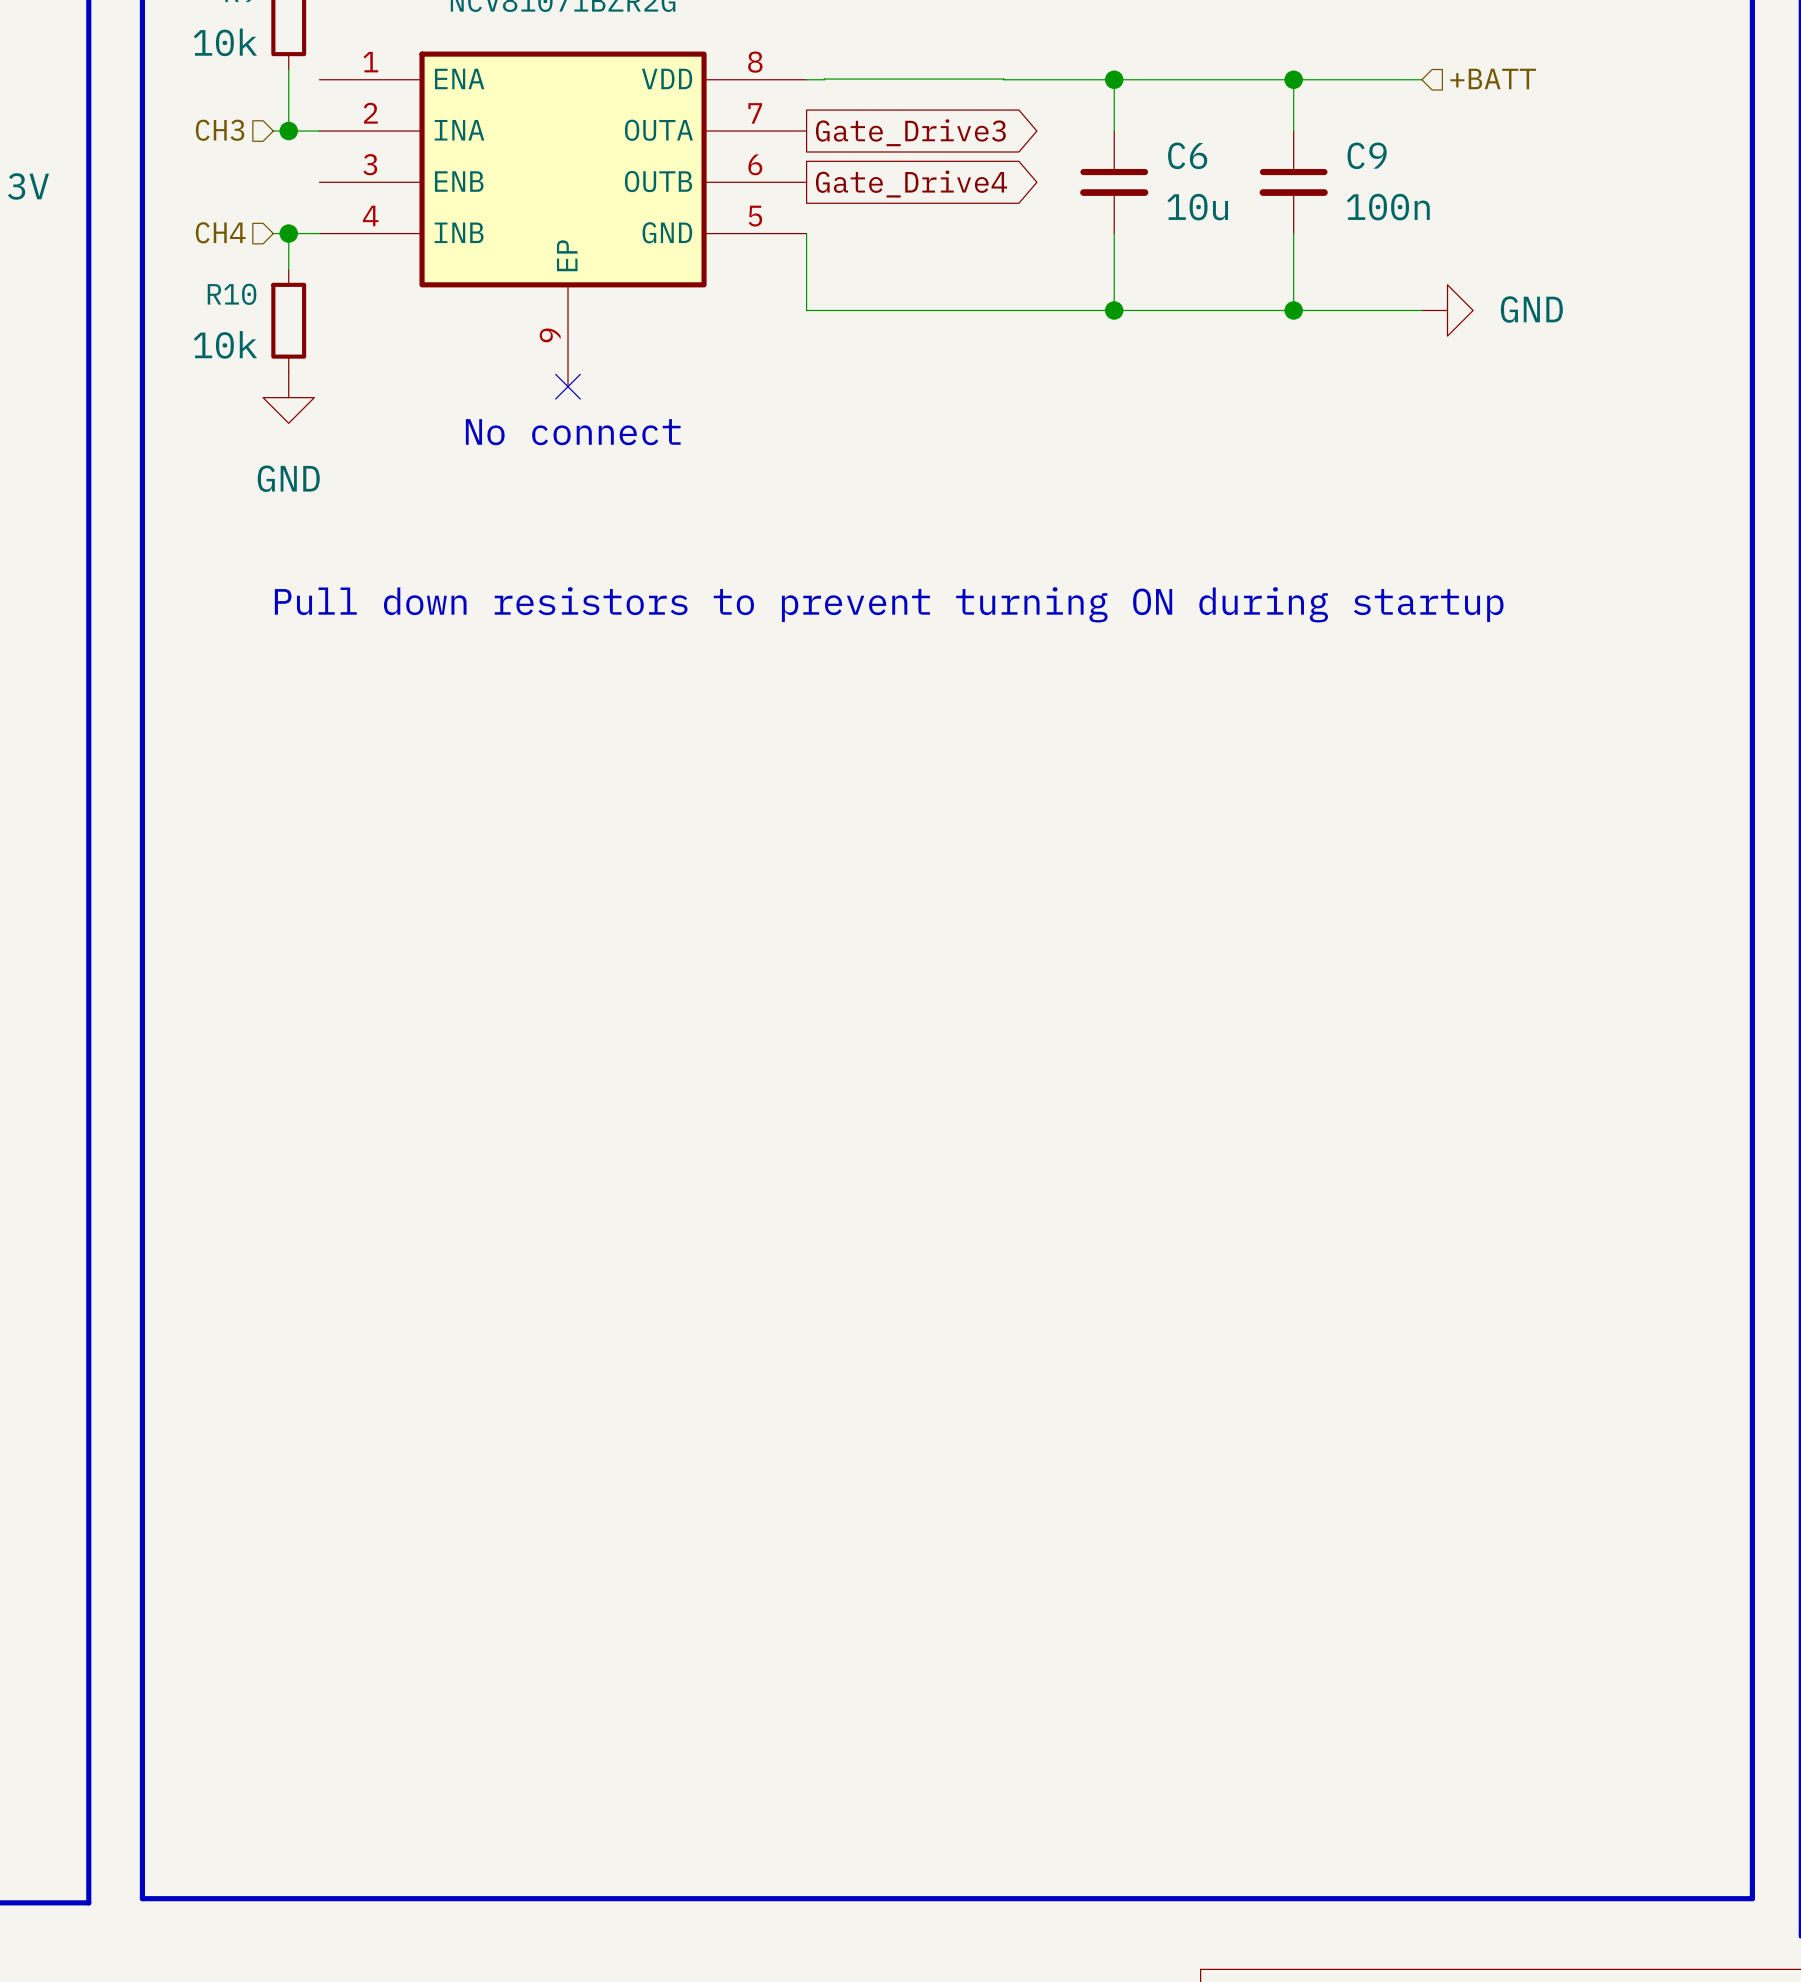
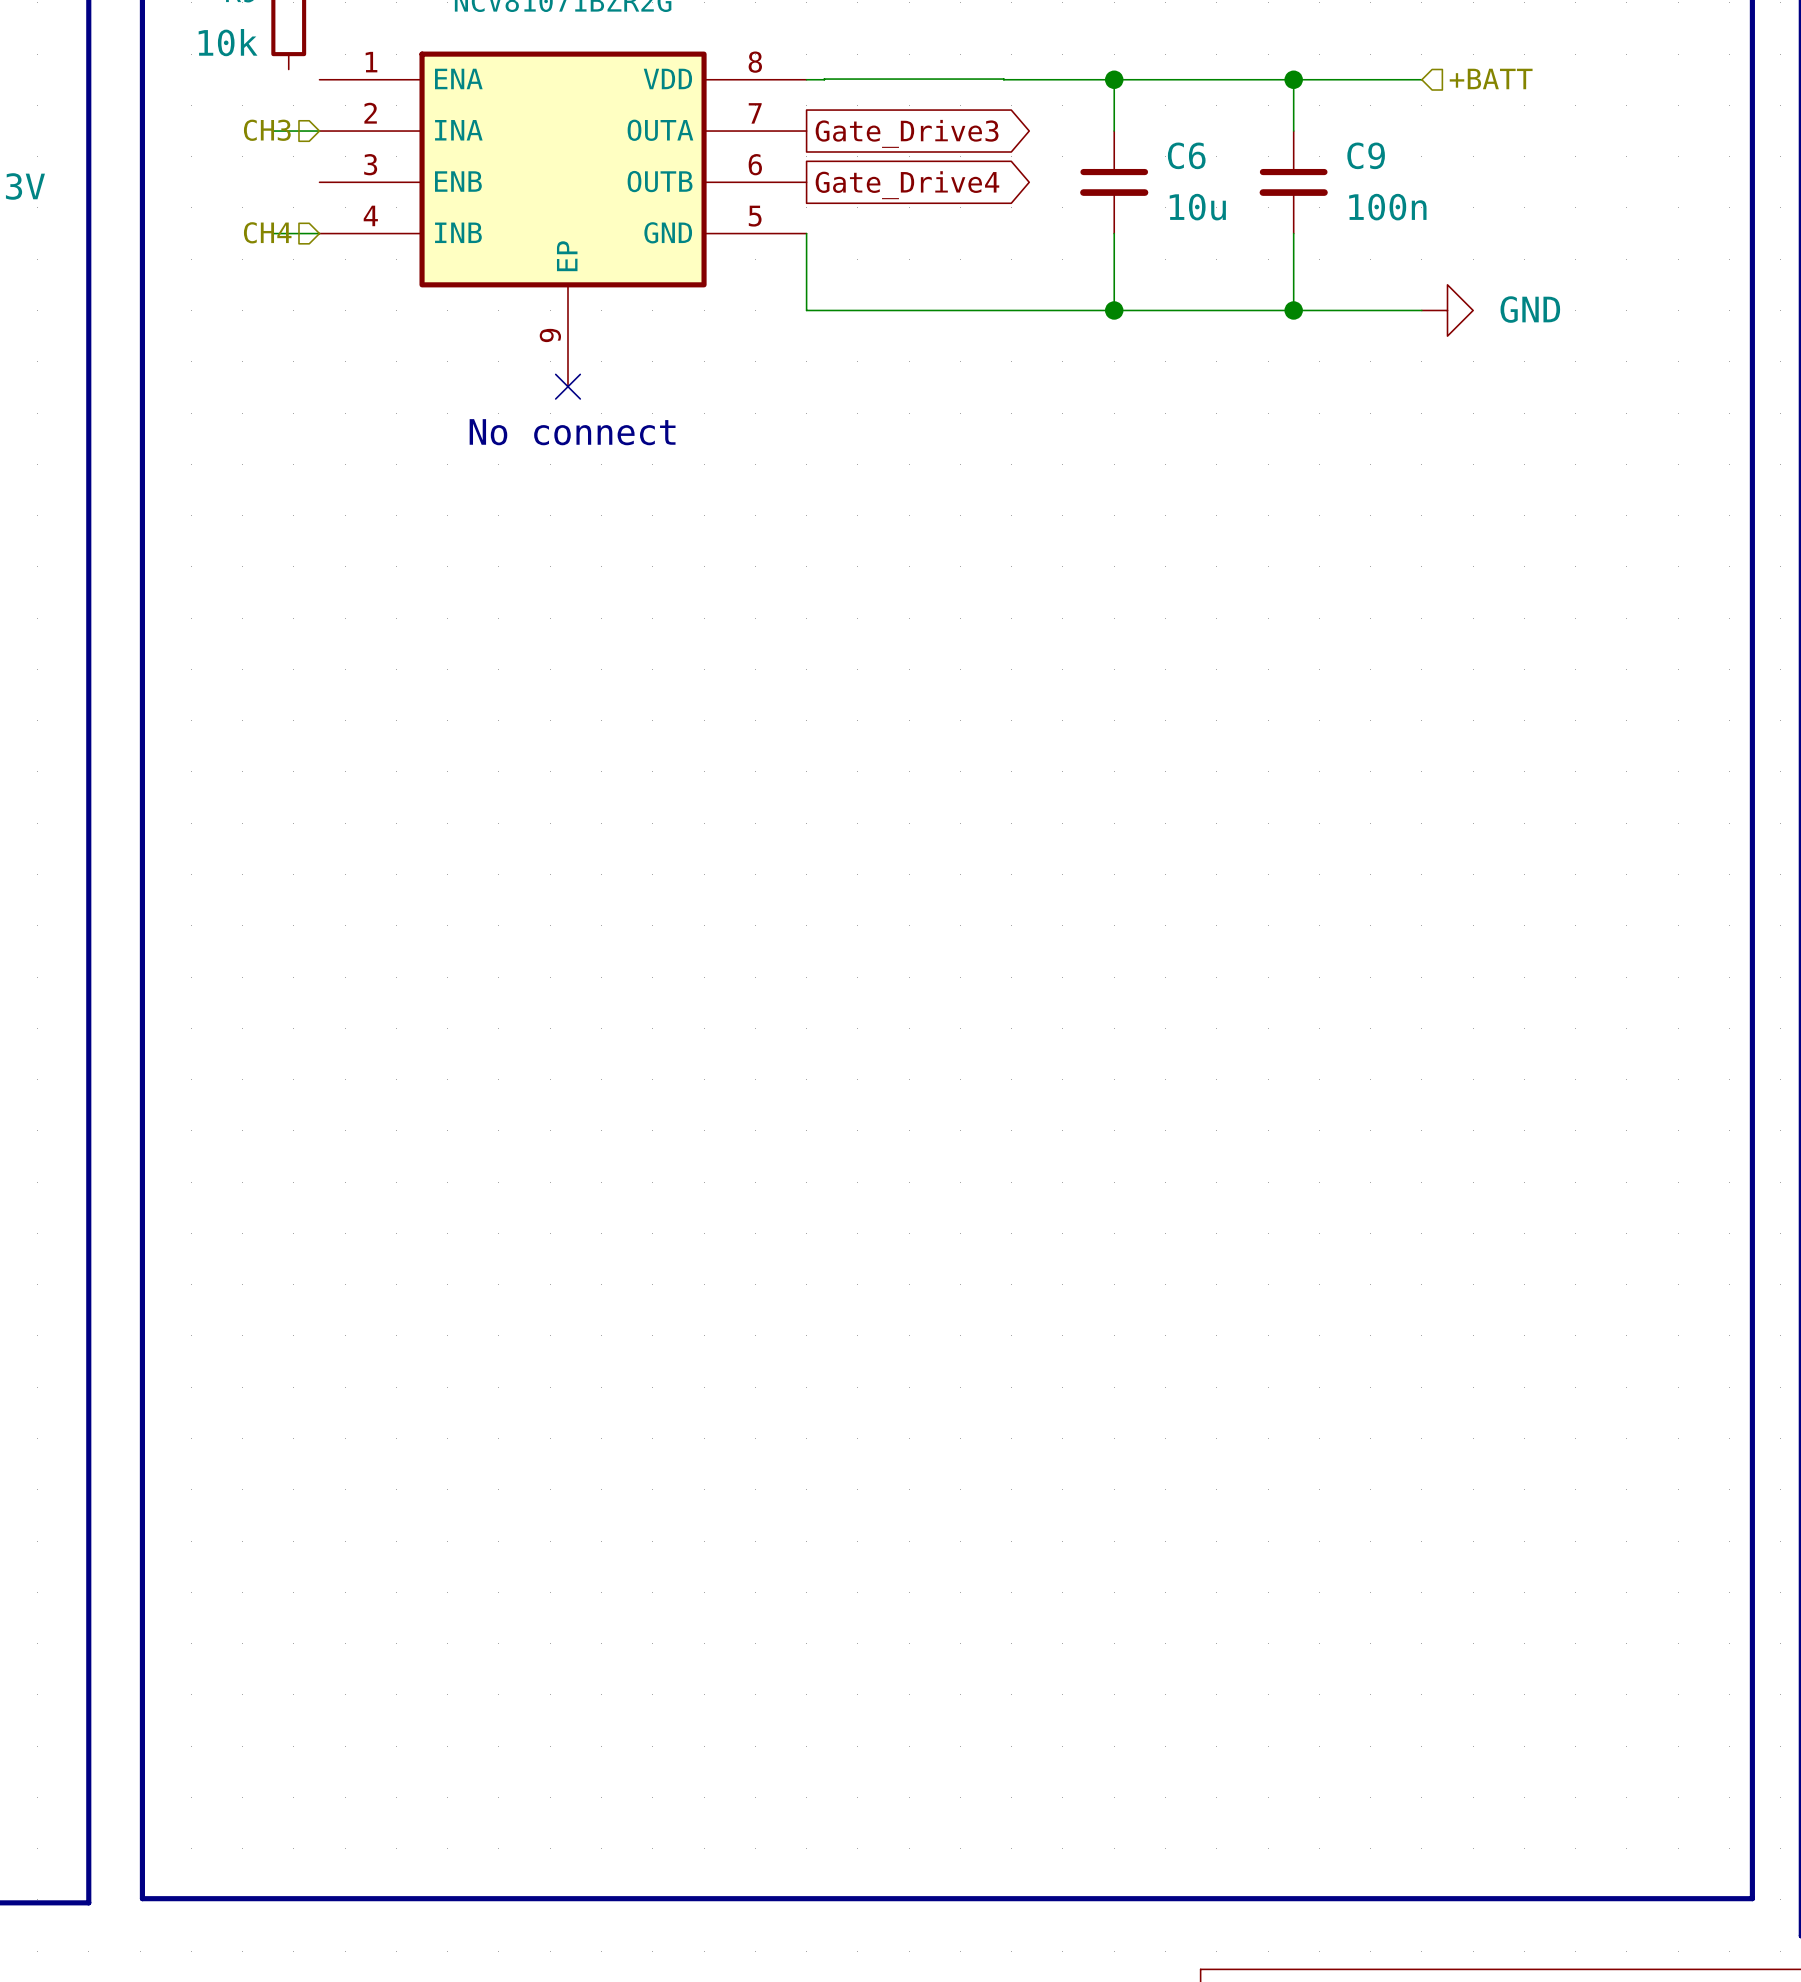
wire: (288, 69) (288, 131) -> none
hierarchical label position: CH3 (220, 130) -> CH3 (267, 130)
junction: (288, 131) -> none
hierarchical label position: CH4 (220, 232) -> CH4 (267, 232)
wire: (288, 233) (288, 269) -> none
junction: (288, 233) -> none
R10: 10k (288, 320) -> none
power symbol: GND (288, 397) -> none
text: Pull down resistors to prevent turning ON during startup (889, 604) -> none

